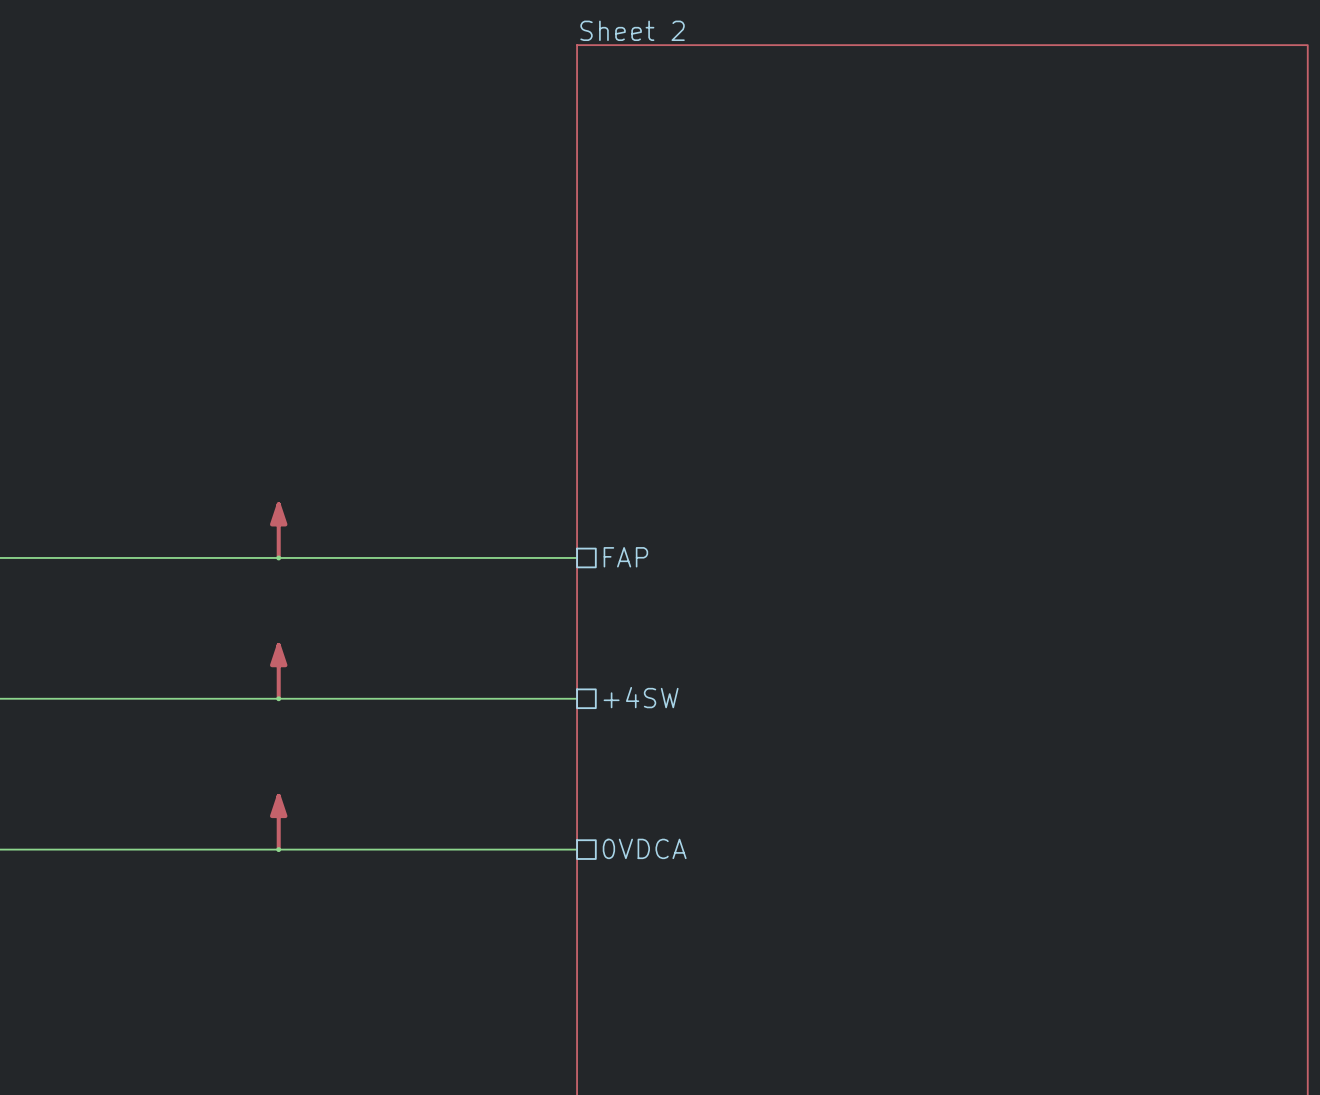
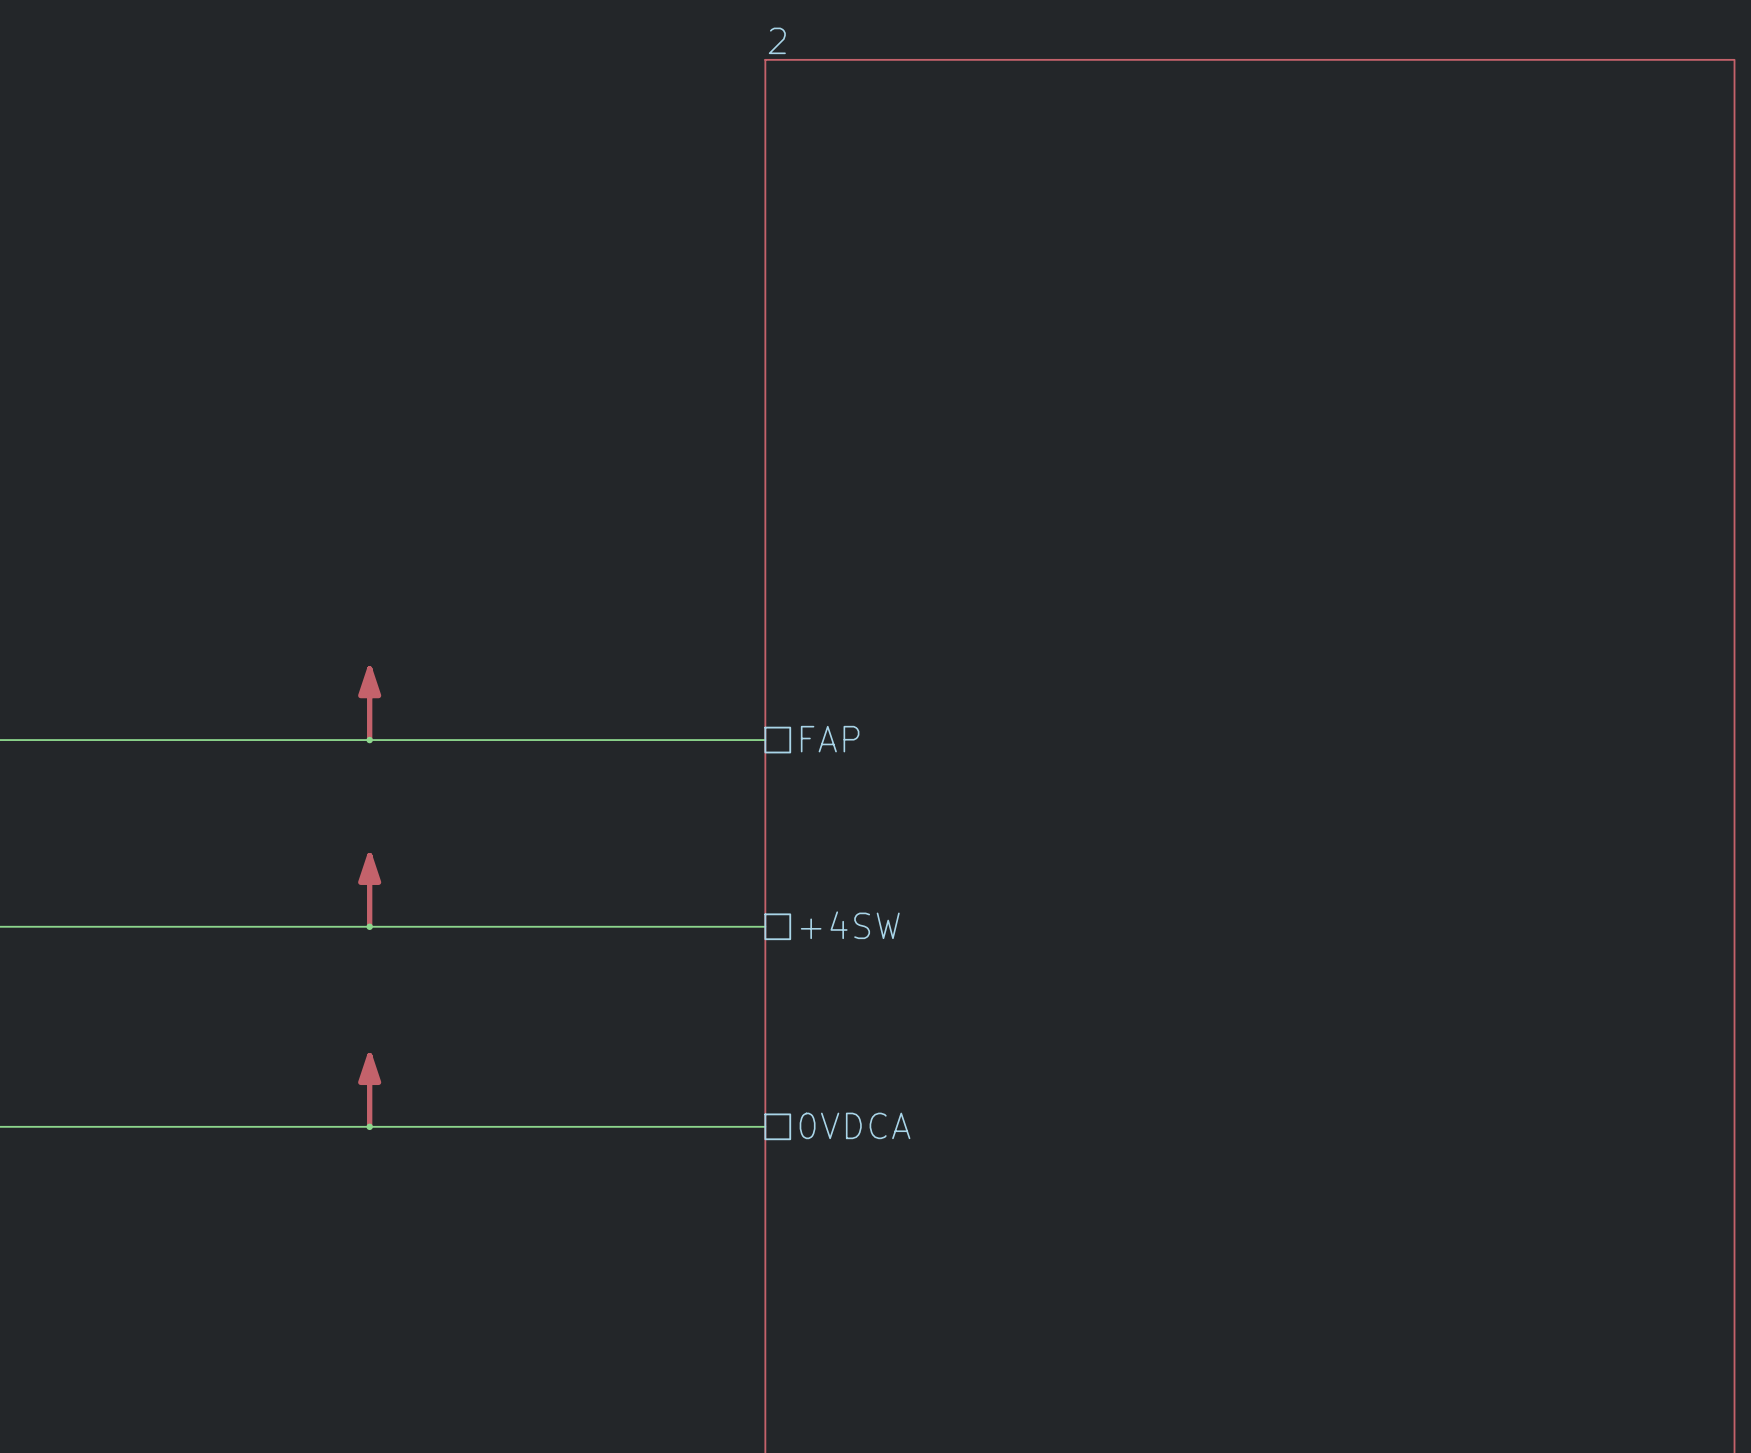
sheet Sheet 2 name: Sheet 2 (632, 30) -> 2 (777, 40)

